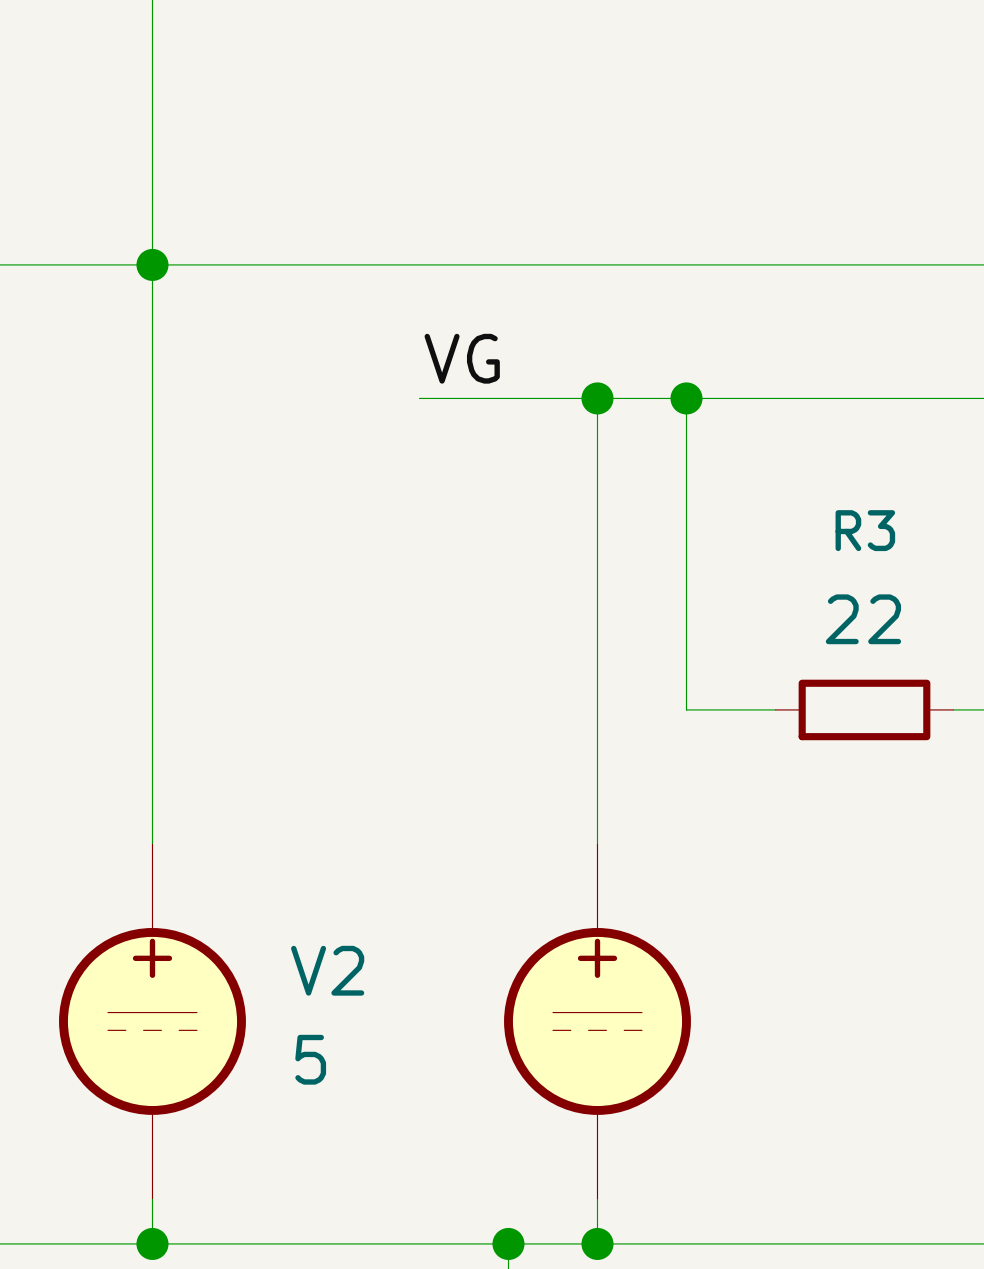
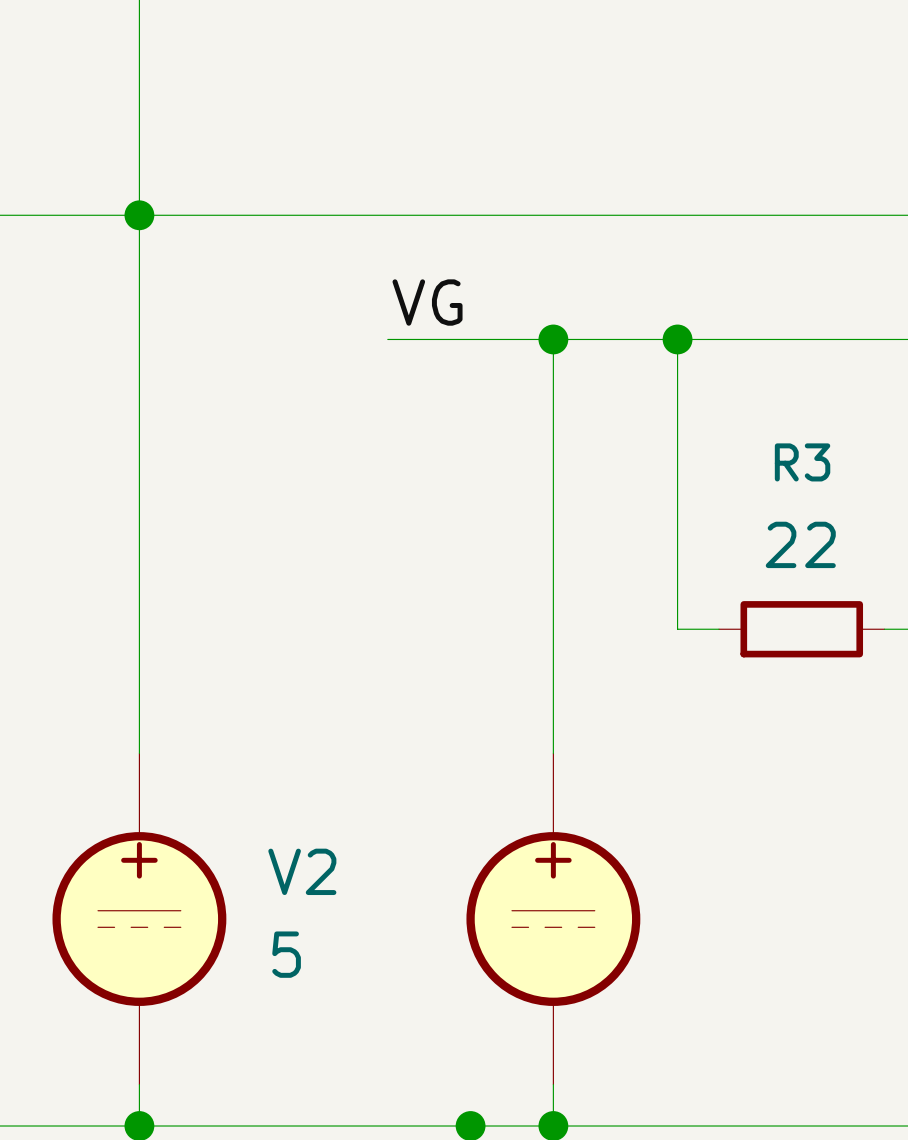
wire: (686, 398) (686, 709) (730, 709) -> (677, 339) (677, 629)
junction position: (686, 398) -> (677, 339)

